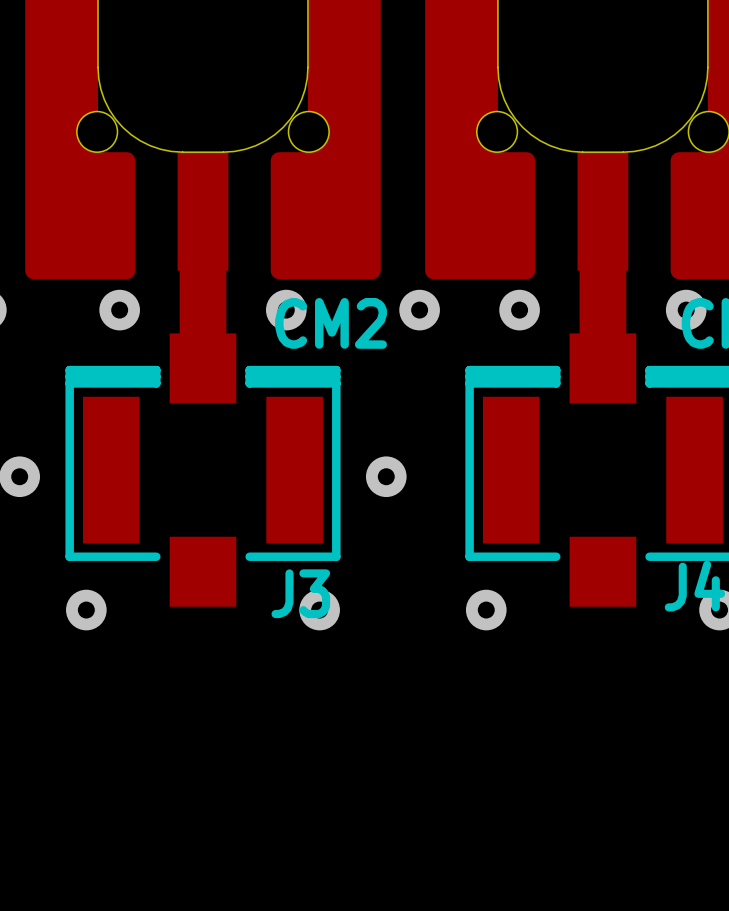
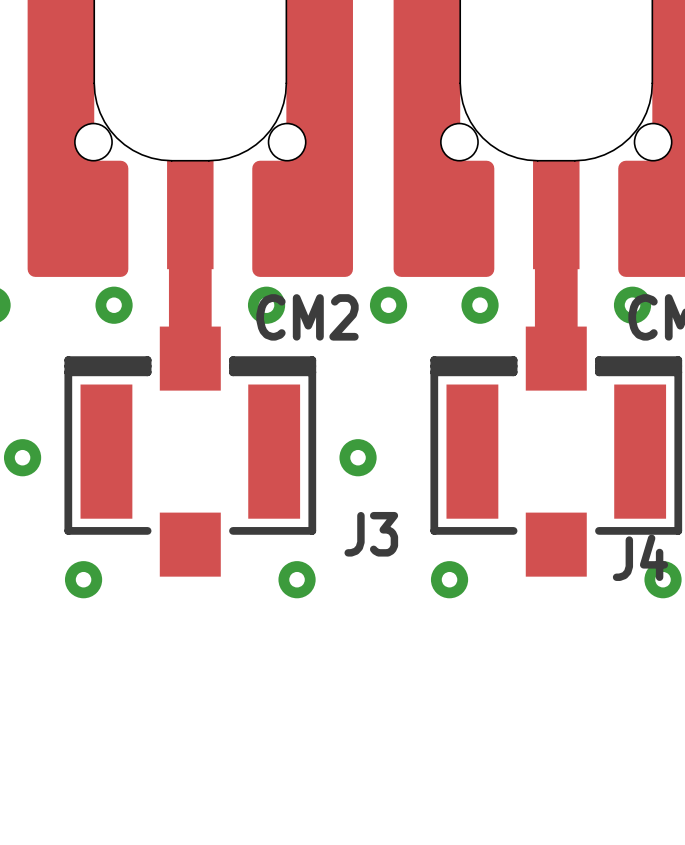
J3 name position: J3 (300, 593) -> J3 (371, 534)

